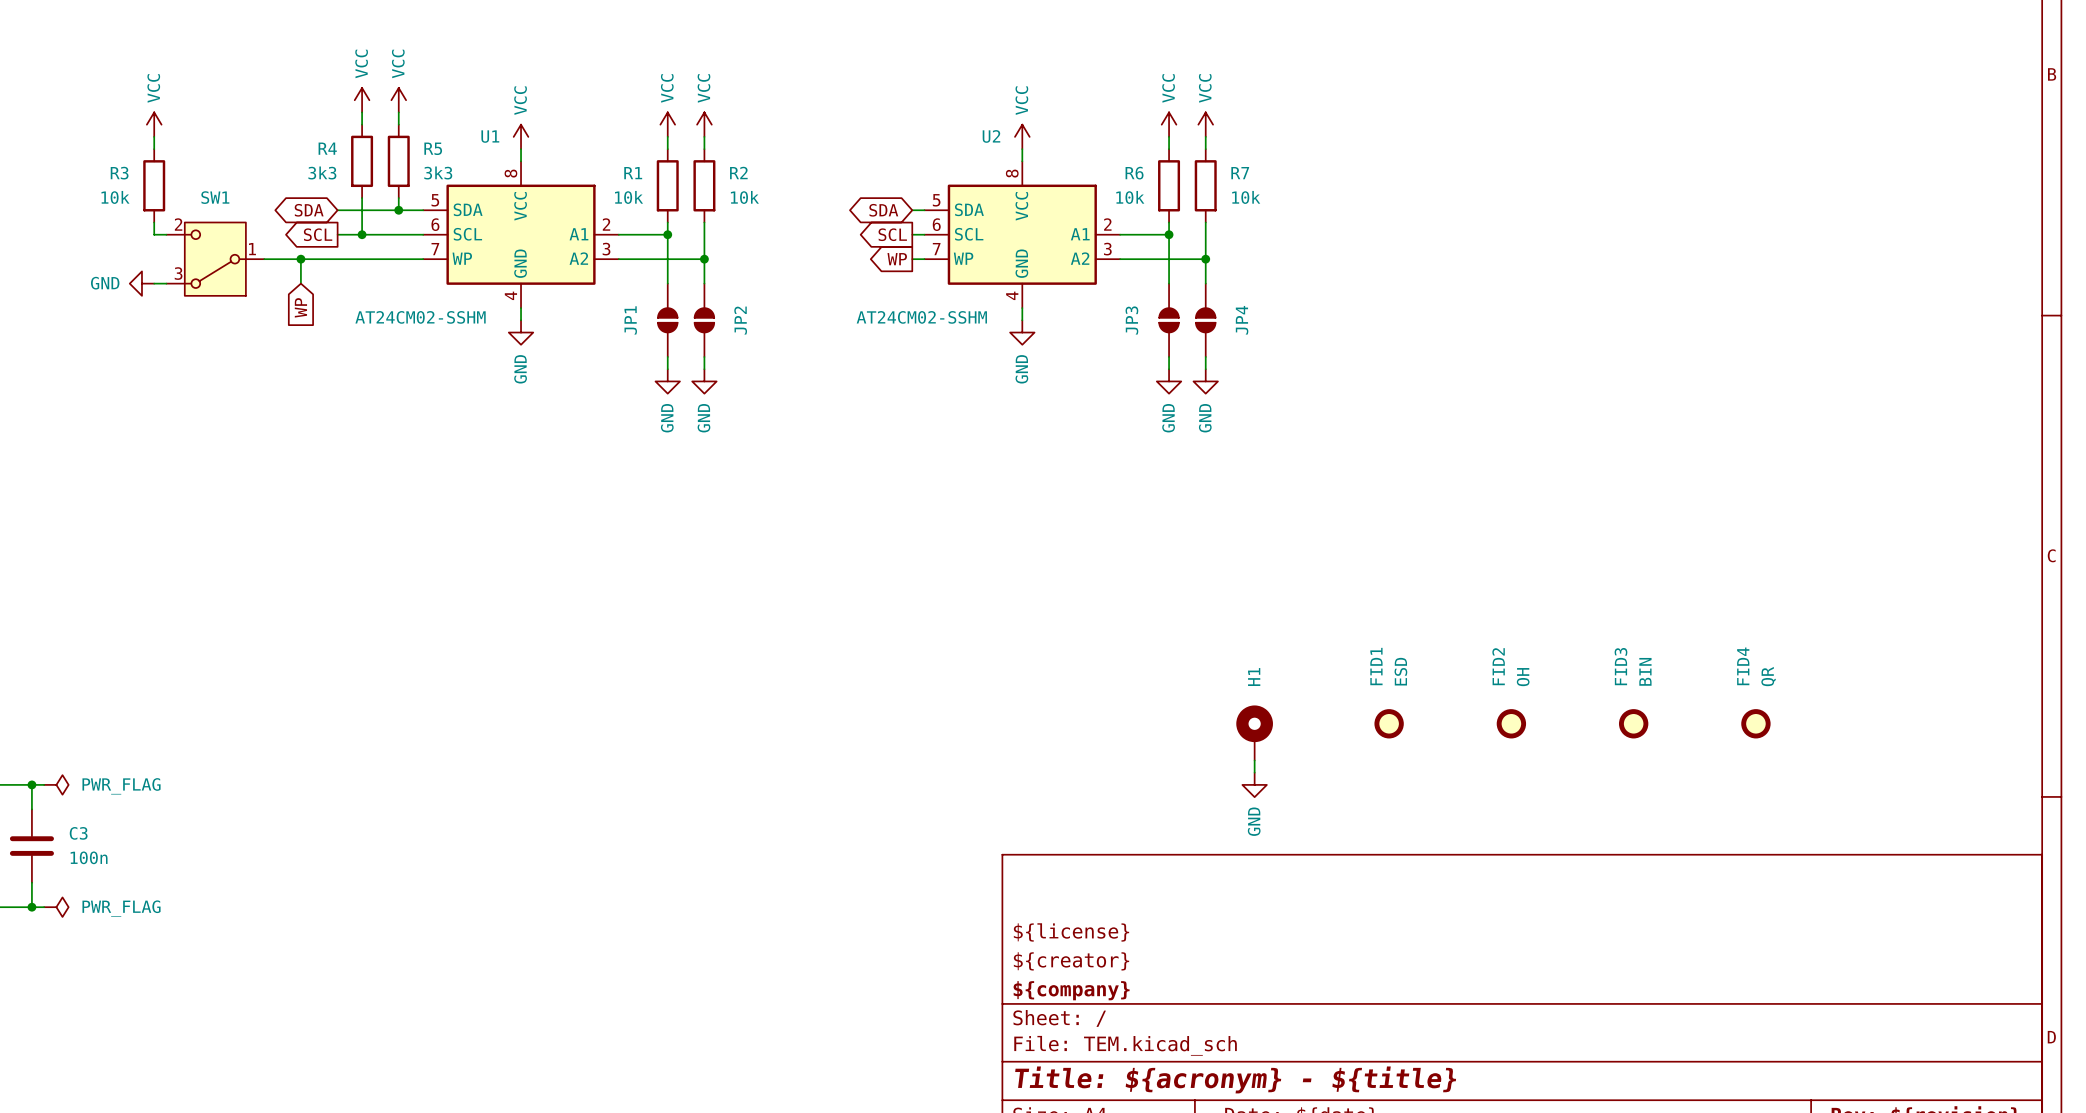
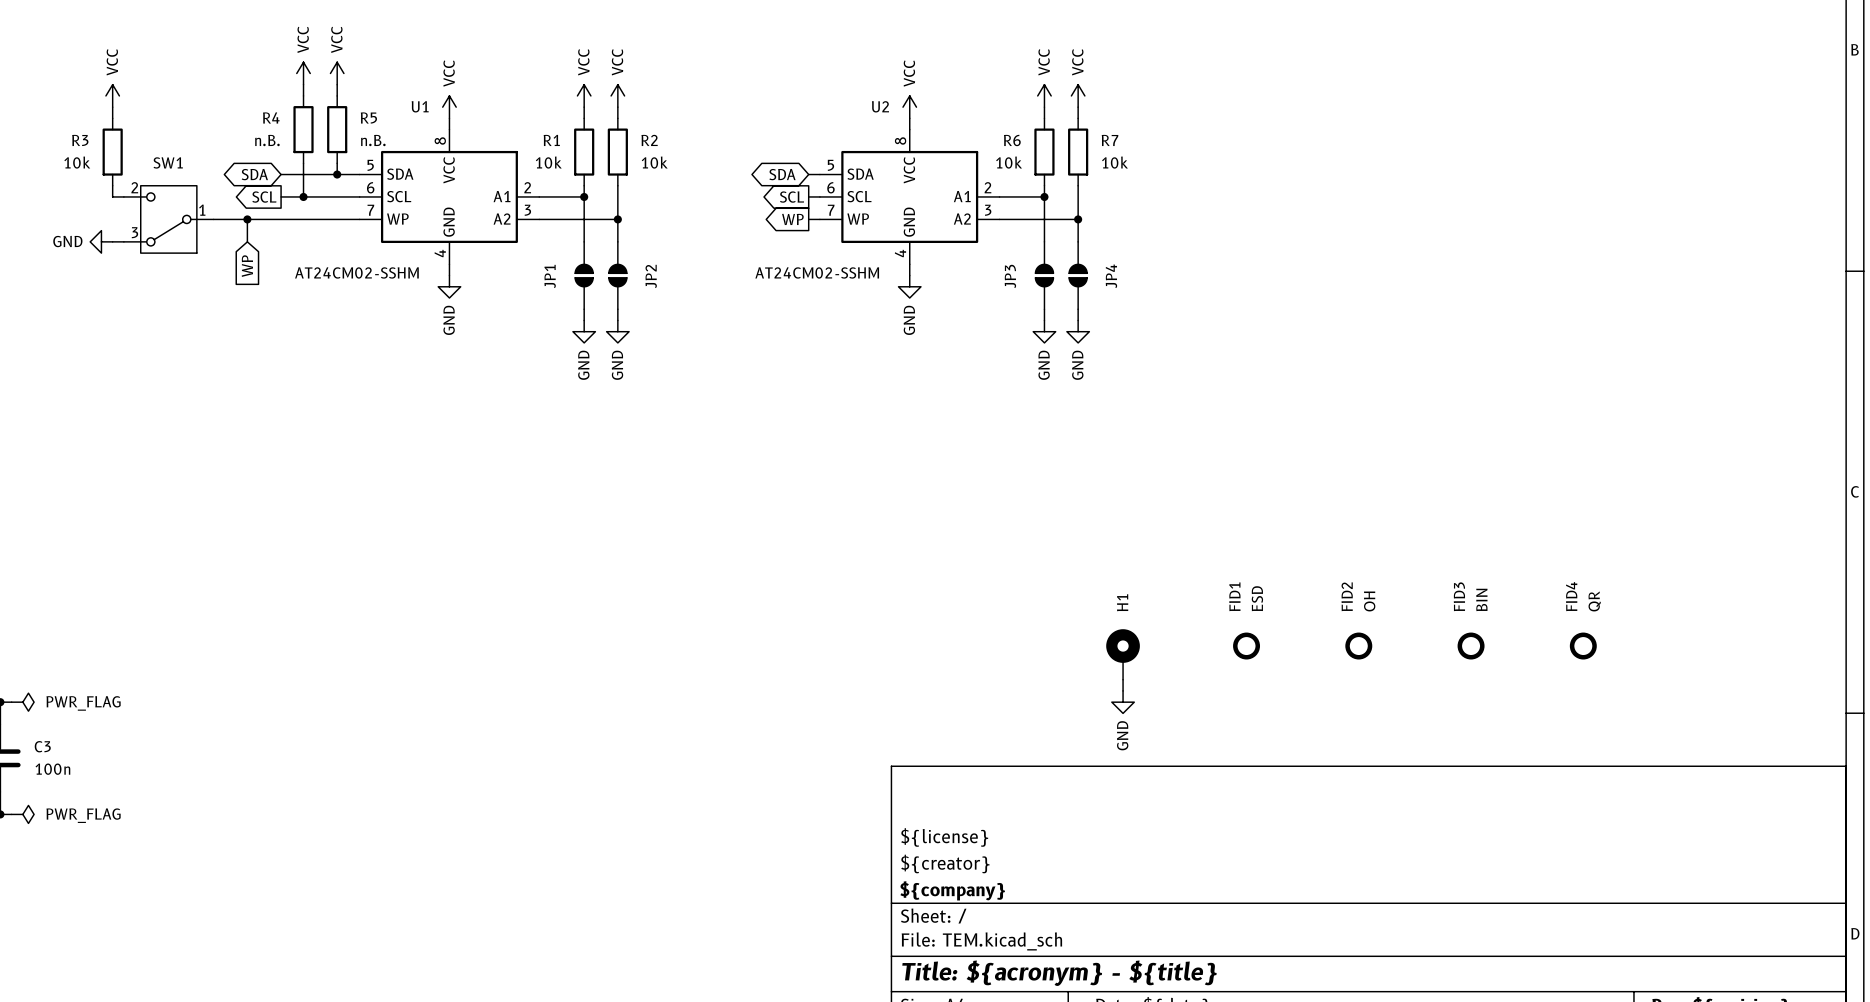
R4 value: 3k3 (322, 172) -> n.B. (267, 140)
R5 value: 3k3 (438, 172) -> n.B. (373, 140)

